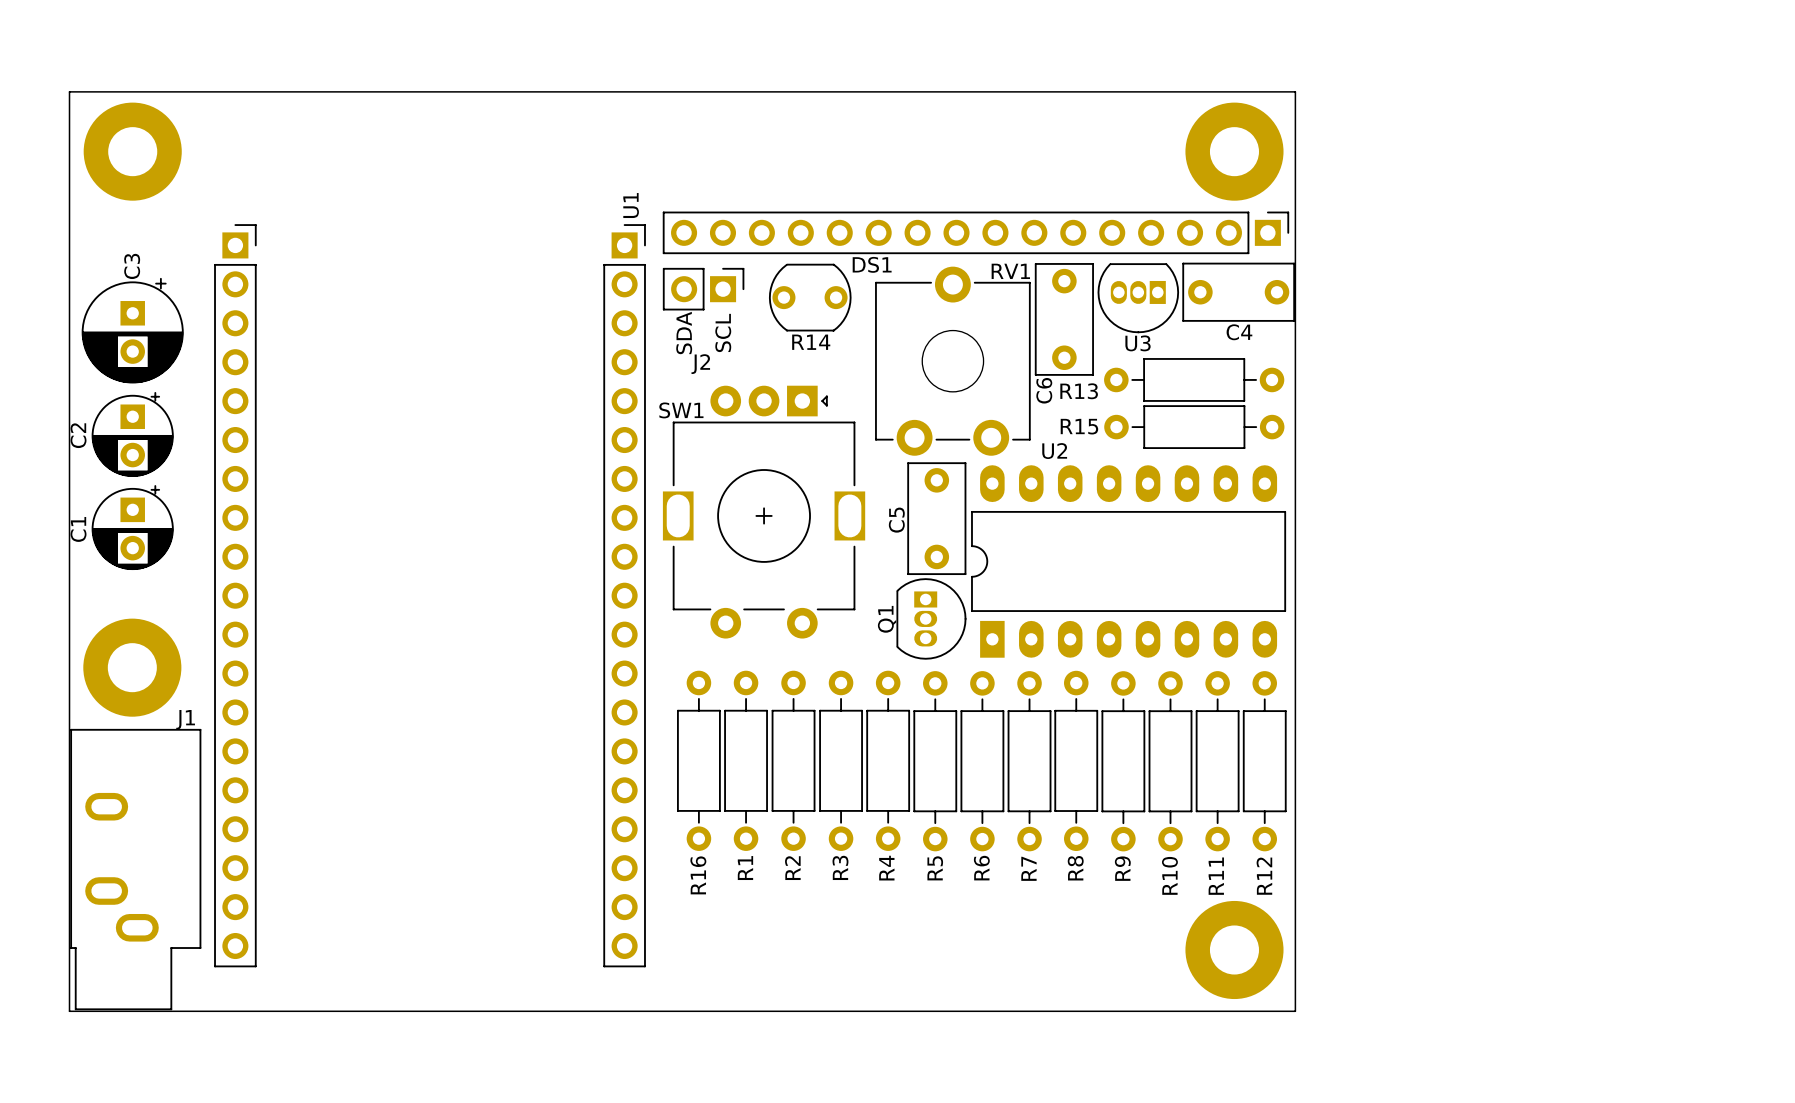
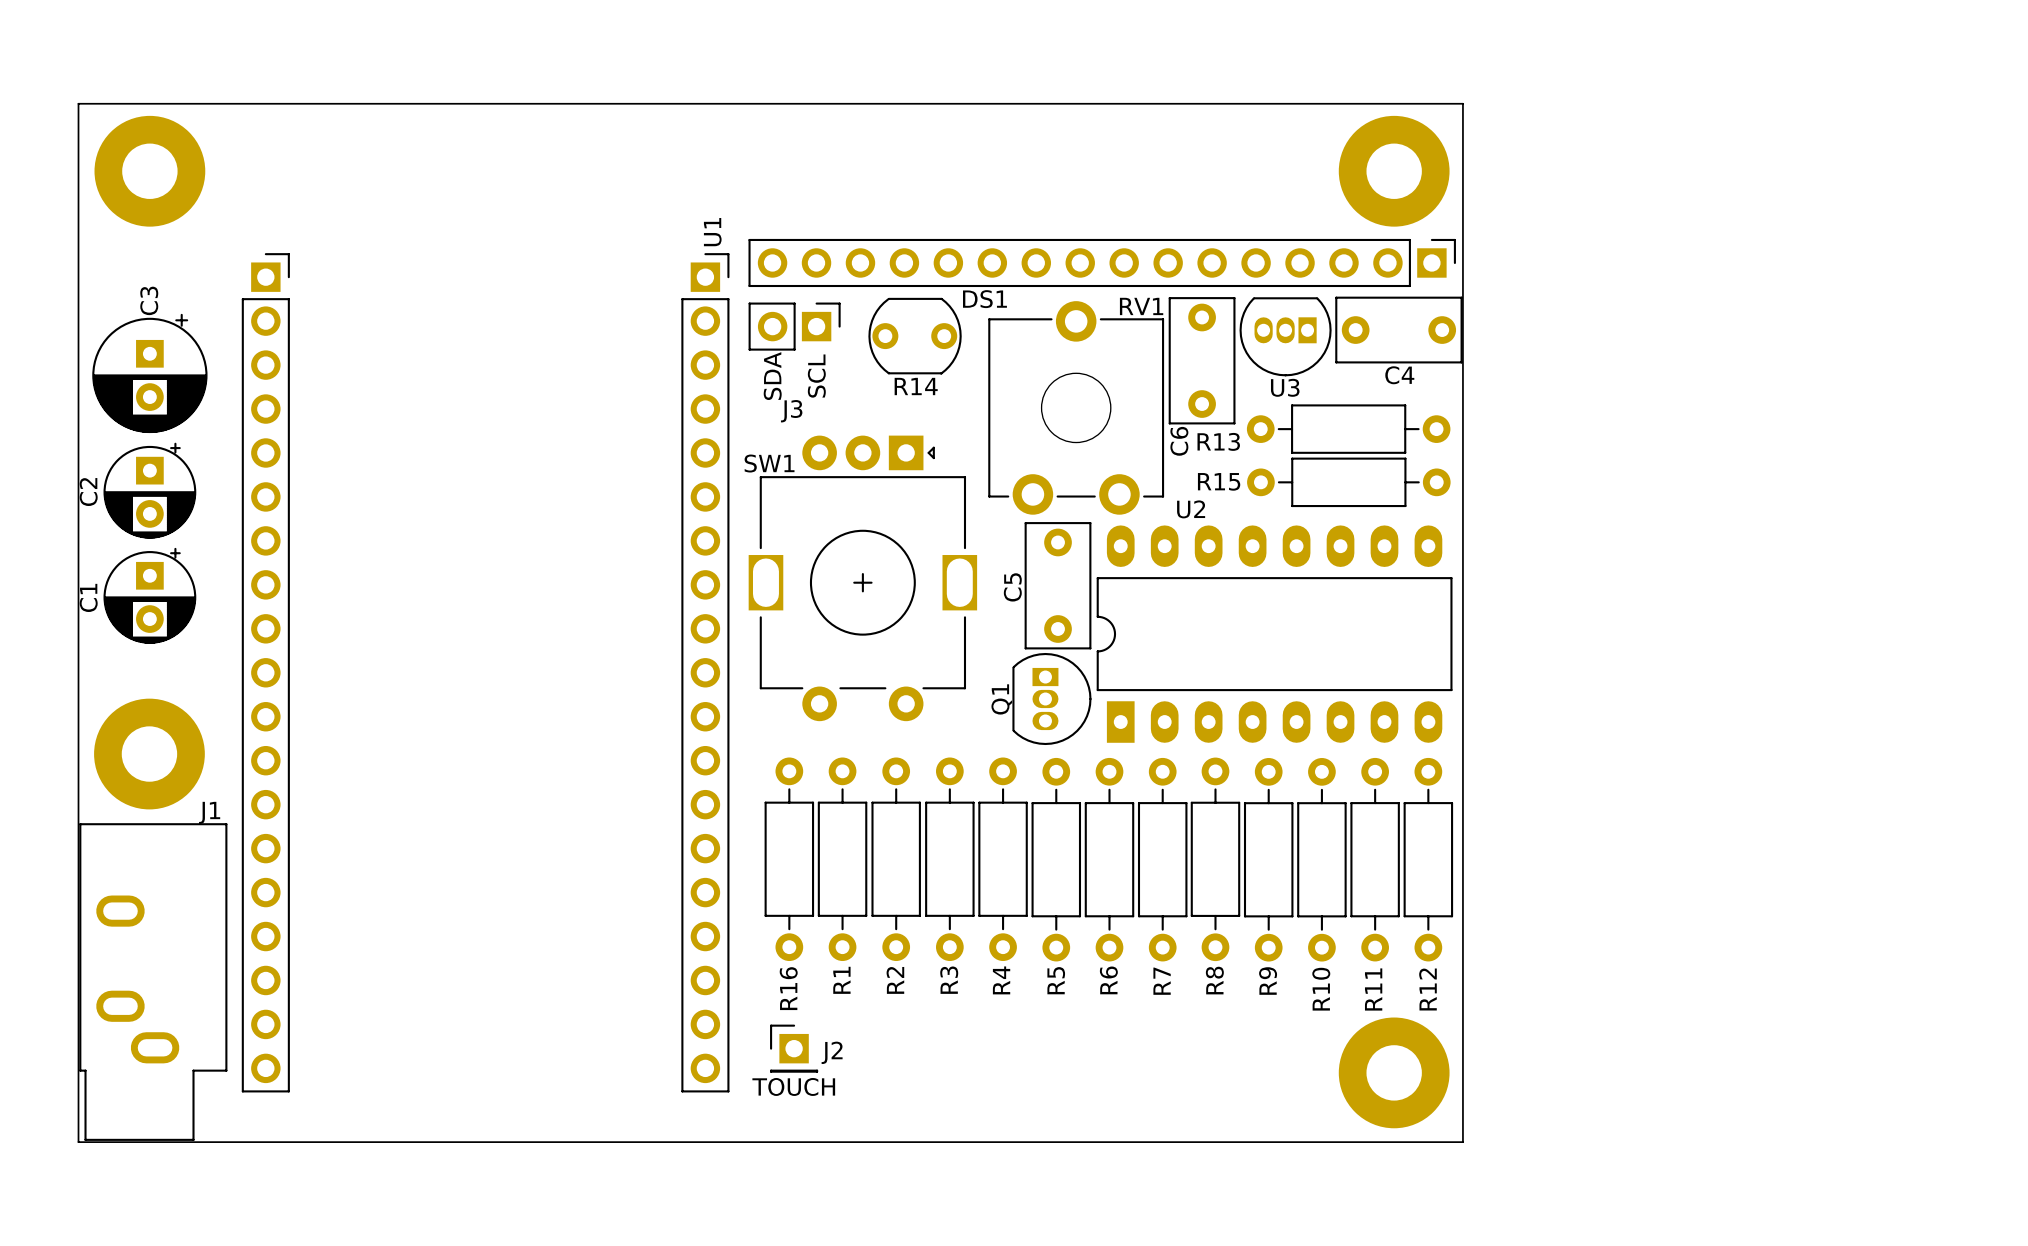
J2 name: J2 (700, 364) -> J3 (791, 411)
J2: none -> (794, 1048)
text: none -> TOUCH (793, 1086)

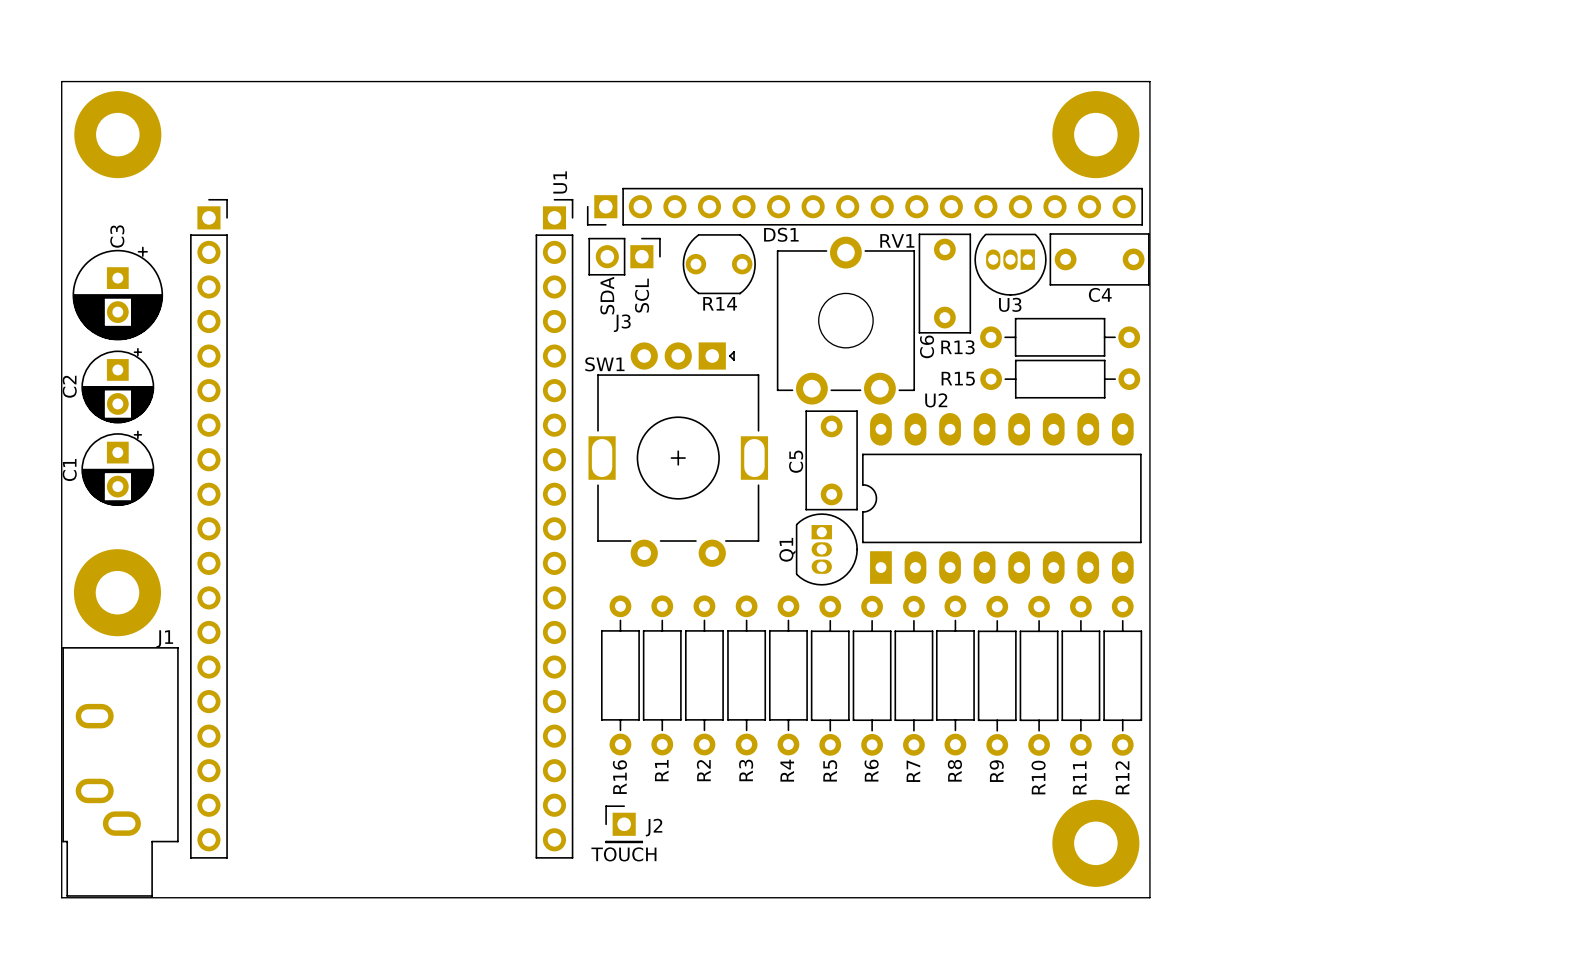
DS1 rotation: 0° (1102, 262) -> 180° (864, 206)

